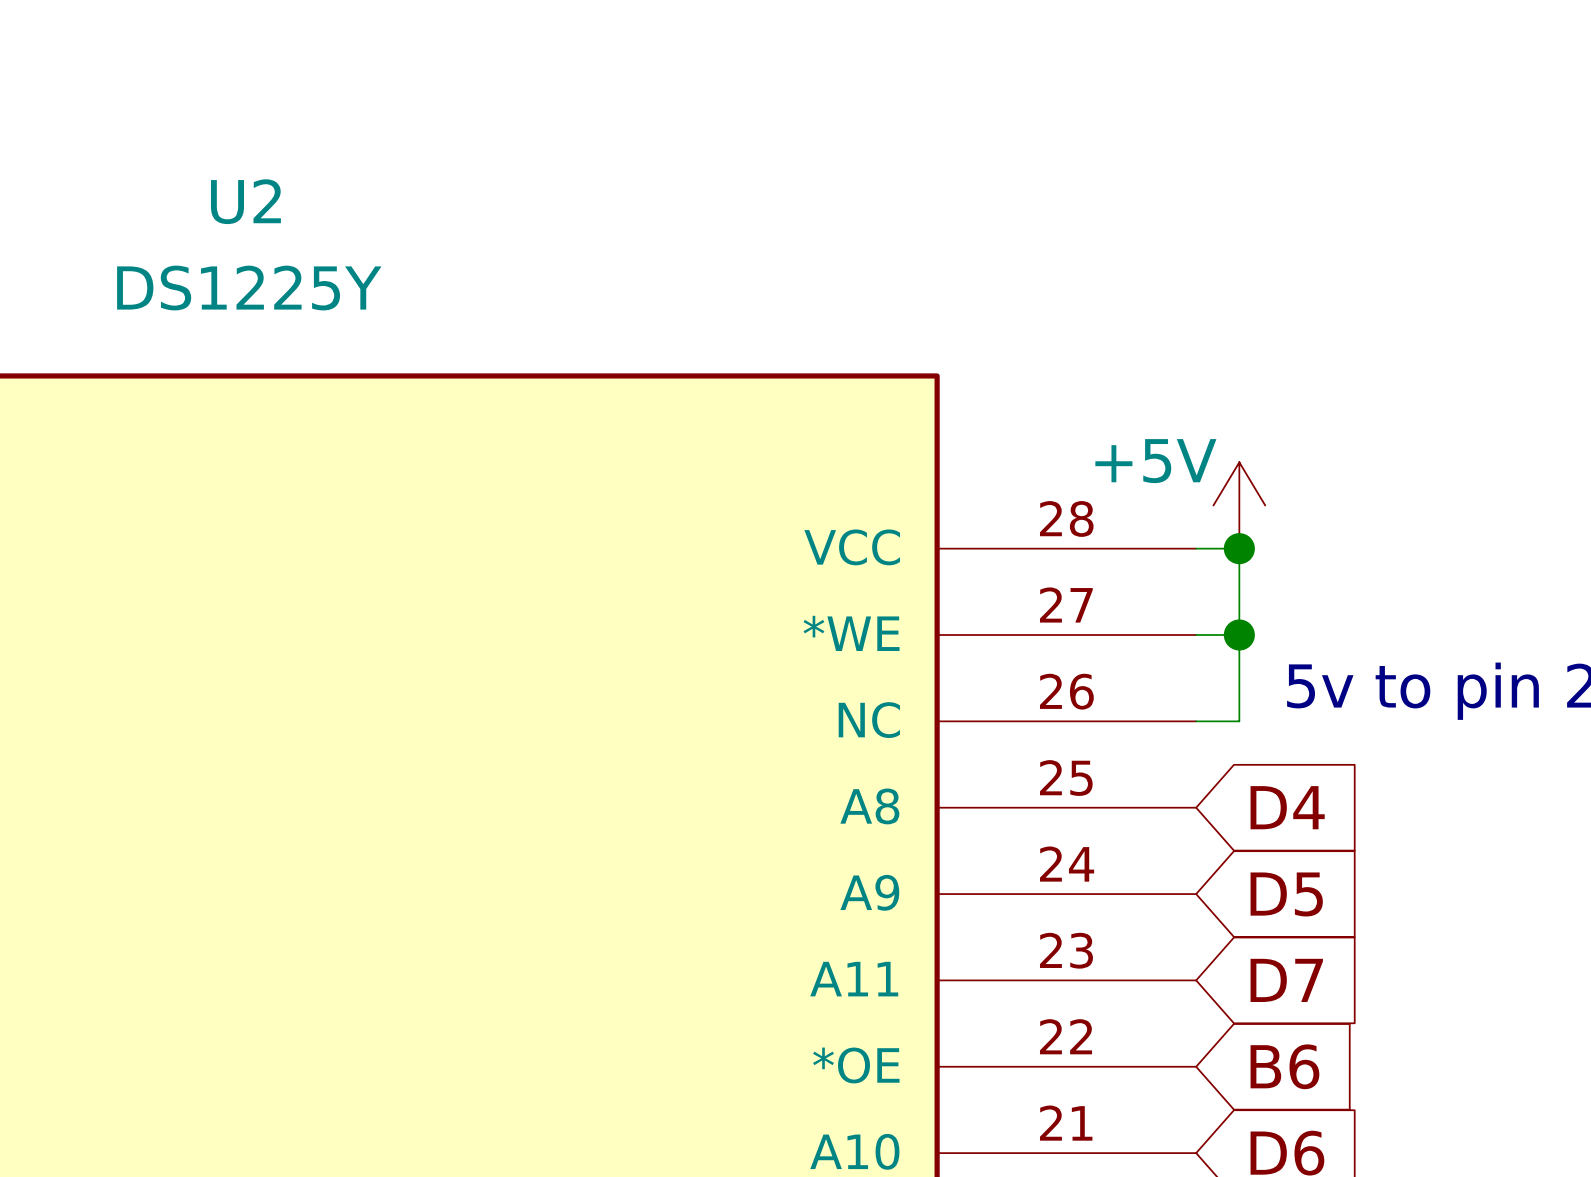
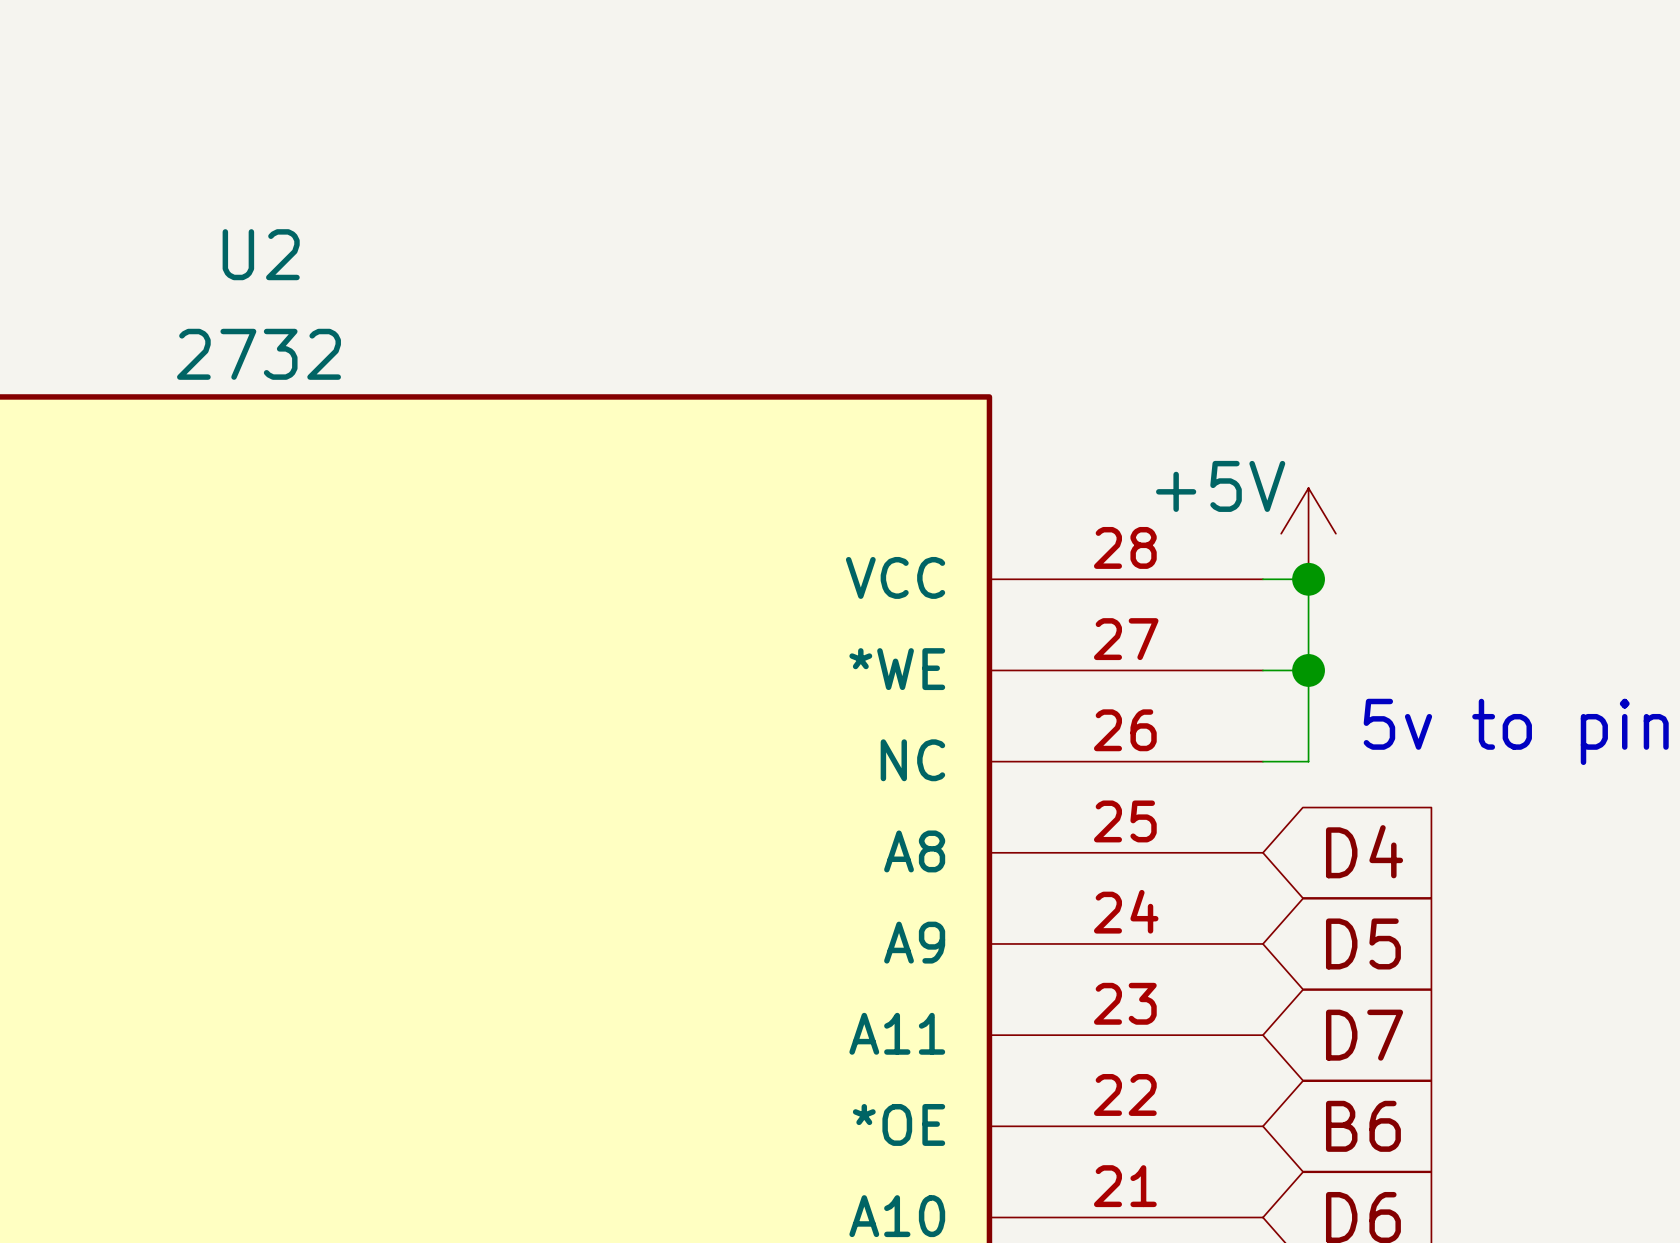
U2 name position: U2 (245, 201) -> U2 (261, 254)
U2 value: DS1225Y (249, 288) -> 2732 (258, 354)

